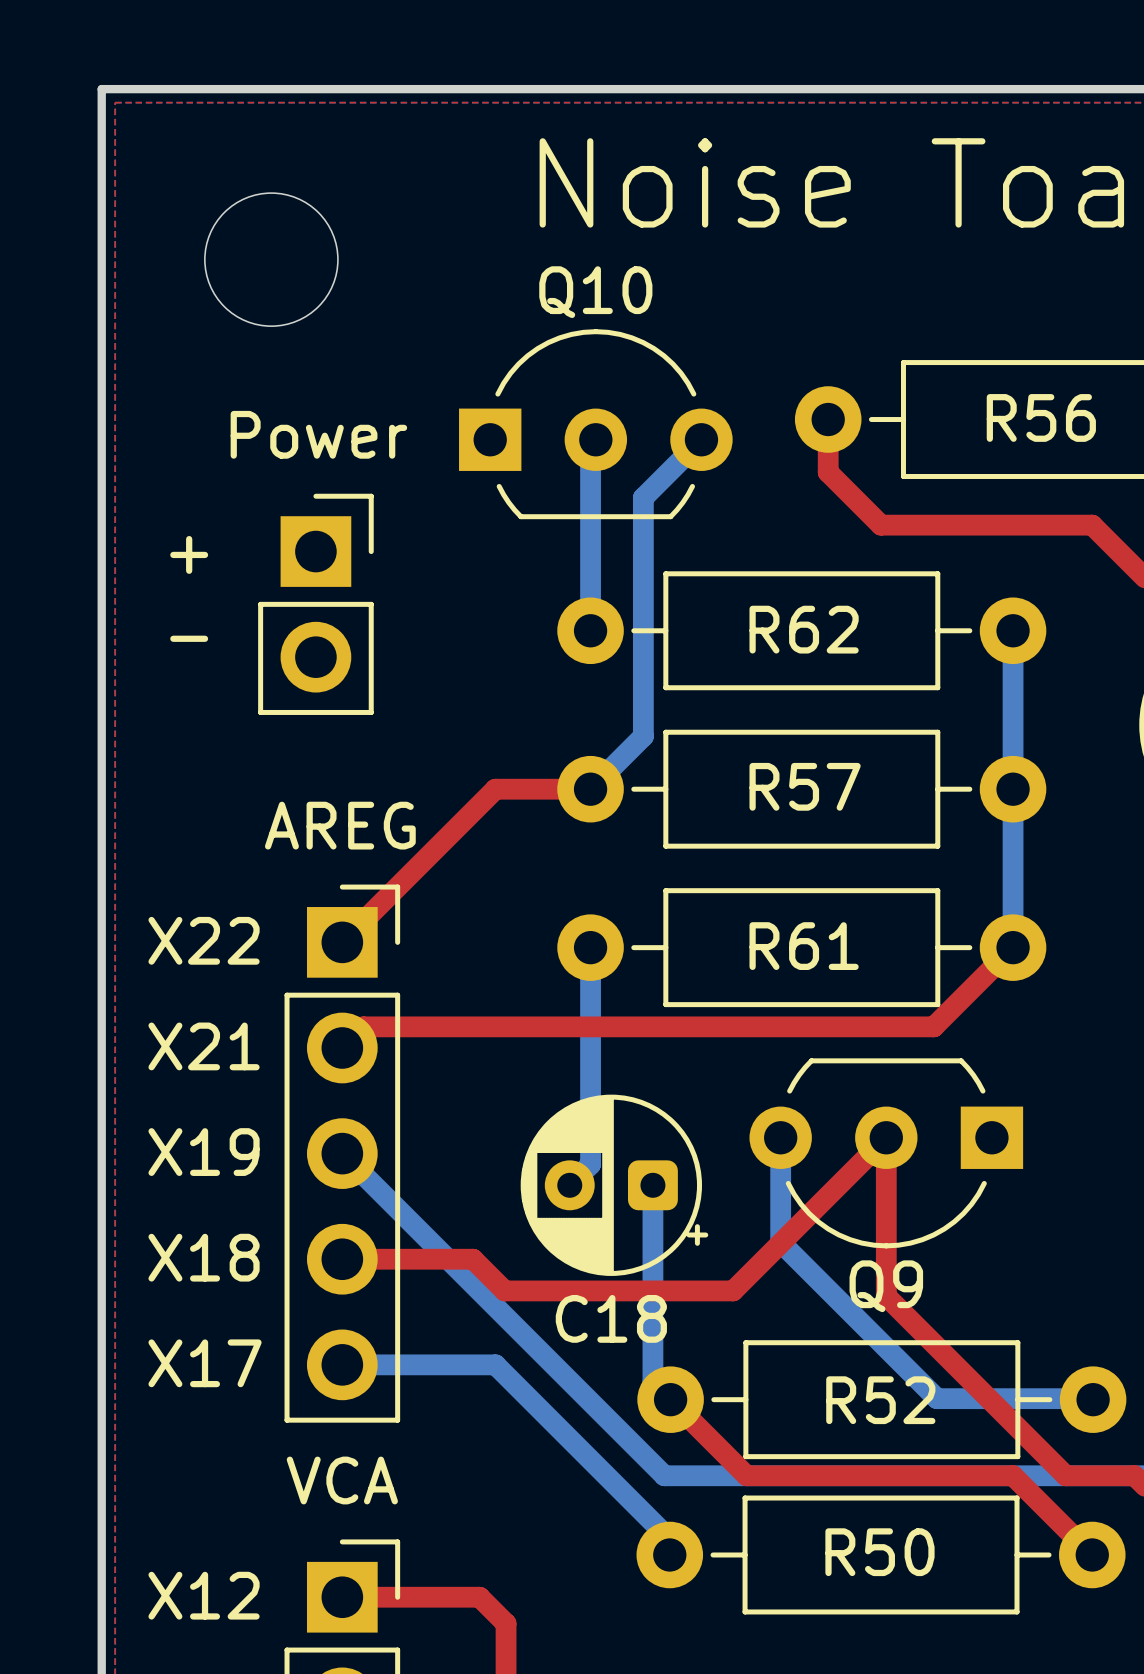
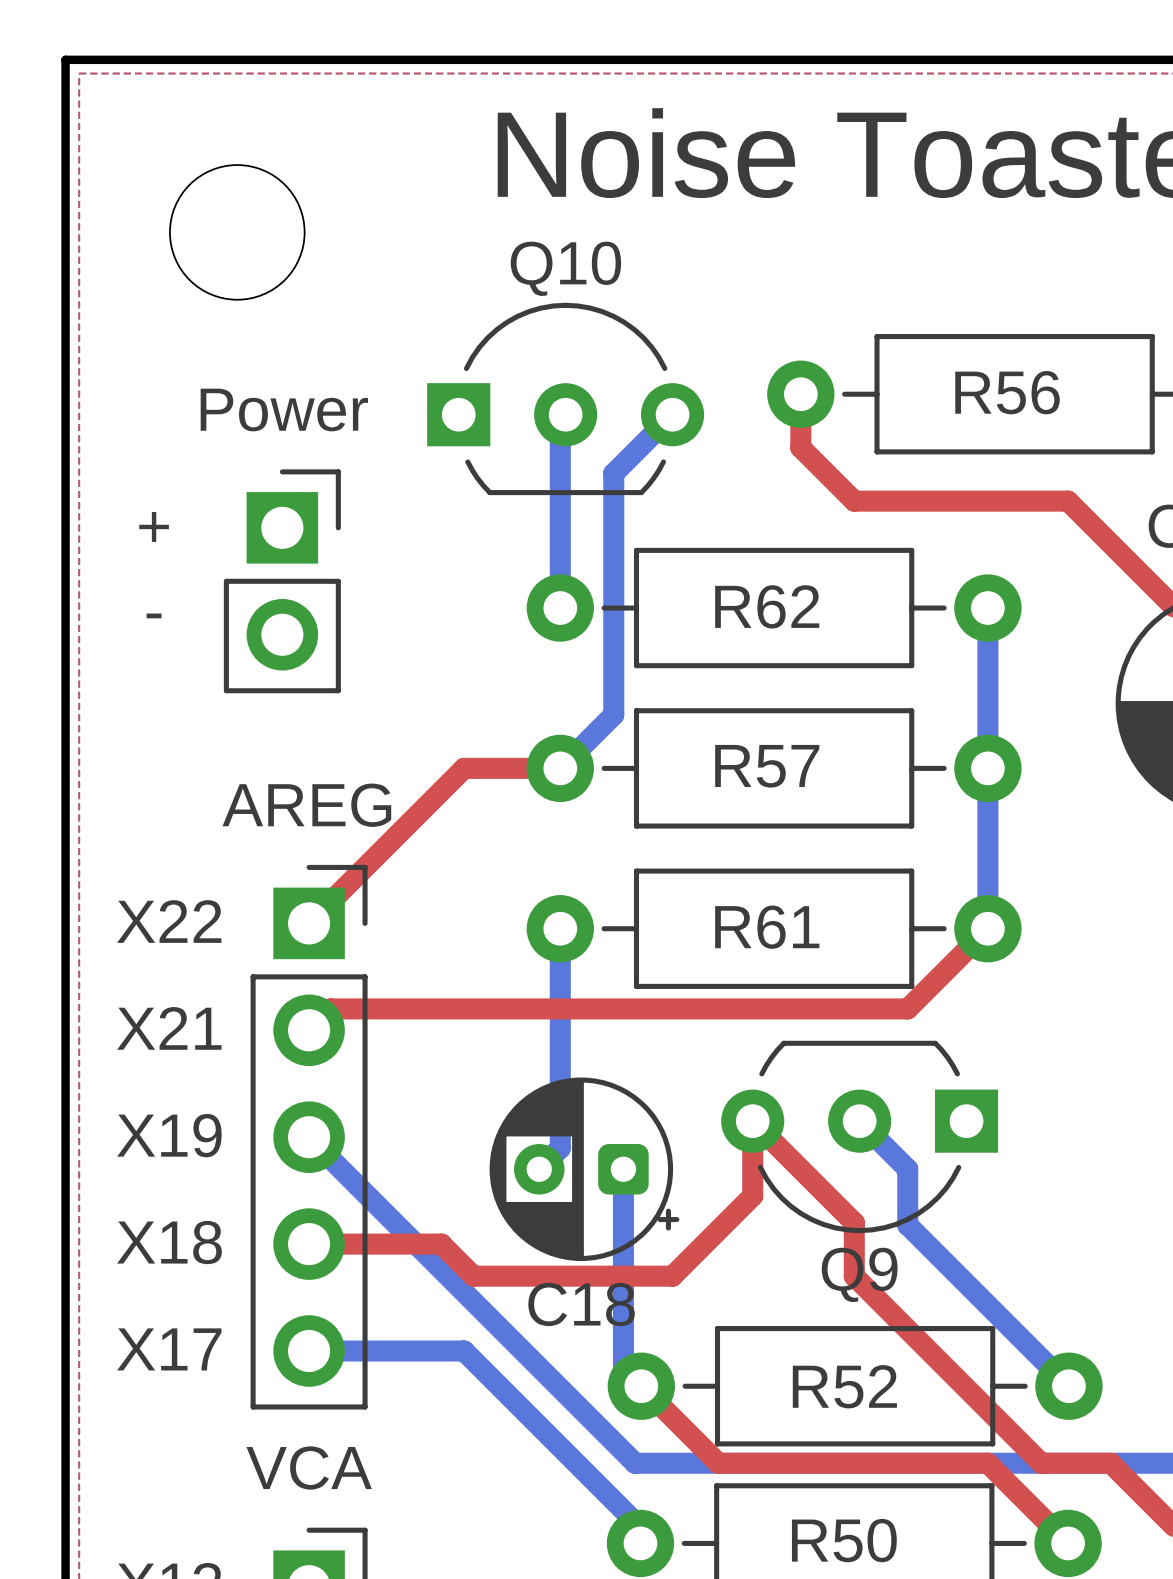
bottom track: (780, 1137) (780, 1242) (937, 1398) (1092, 1398) -> (859, 1121) (907, 1169) (907, 1225) (1067, 1385)
top track: (701, 1290) (733, 1290) (886, 1137) (886, 1296) -> (672, 1276) (752, 1195) (752, 1121) (854, 1222) (854, 1276) (859, 1281)

